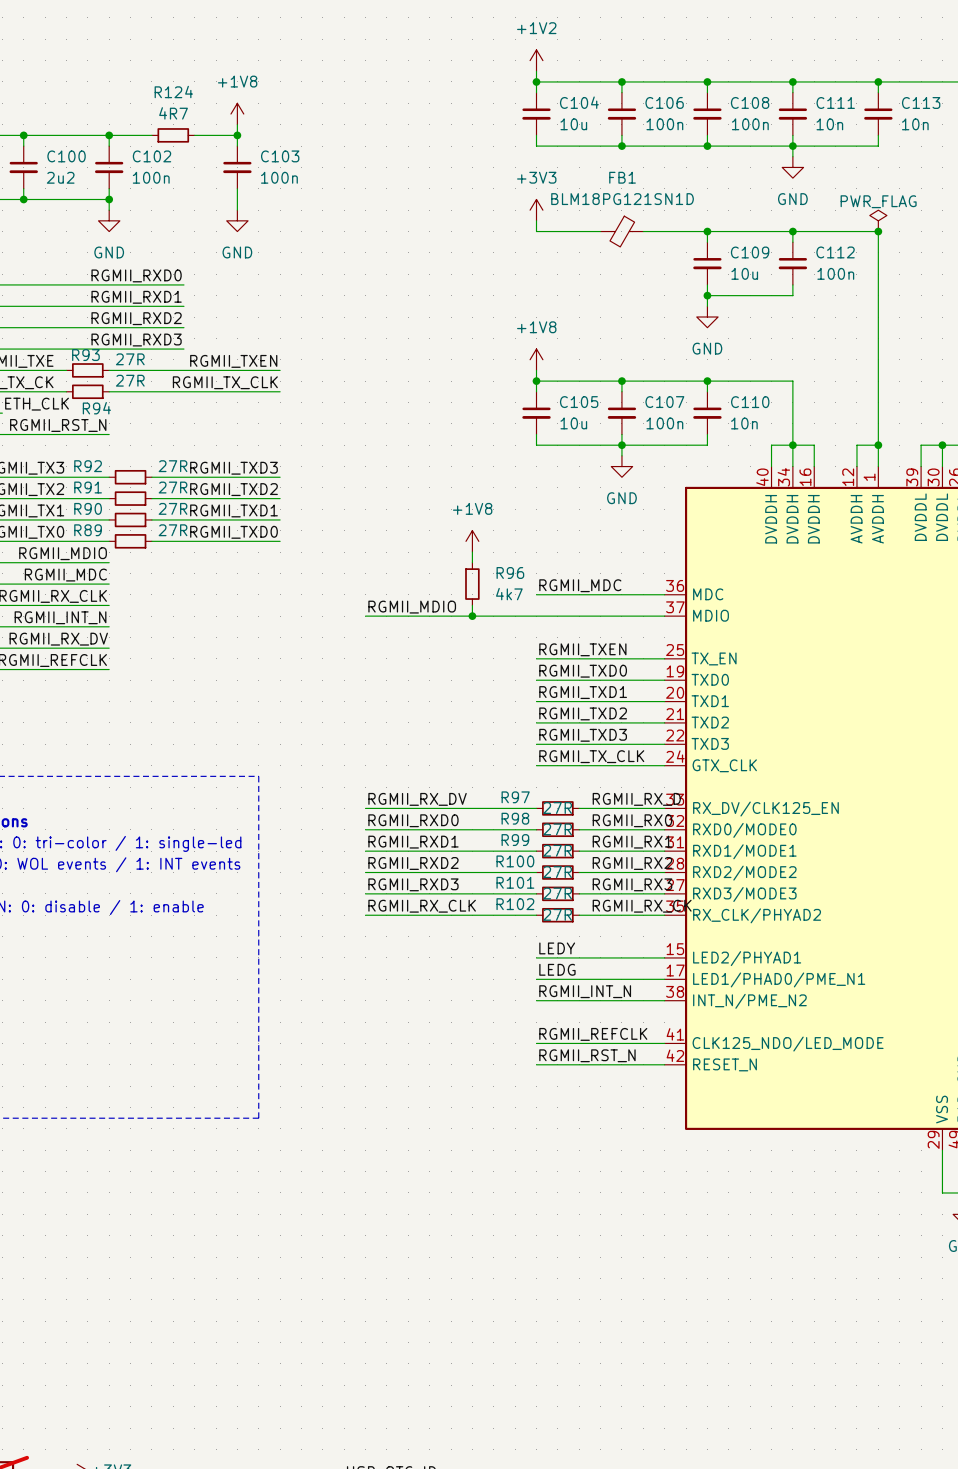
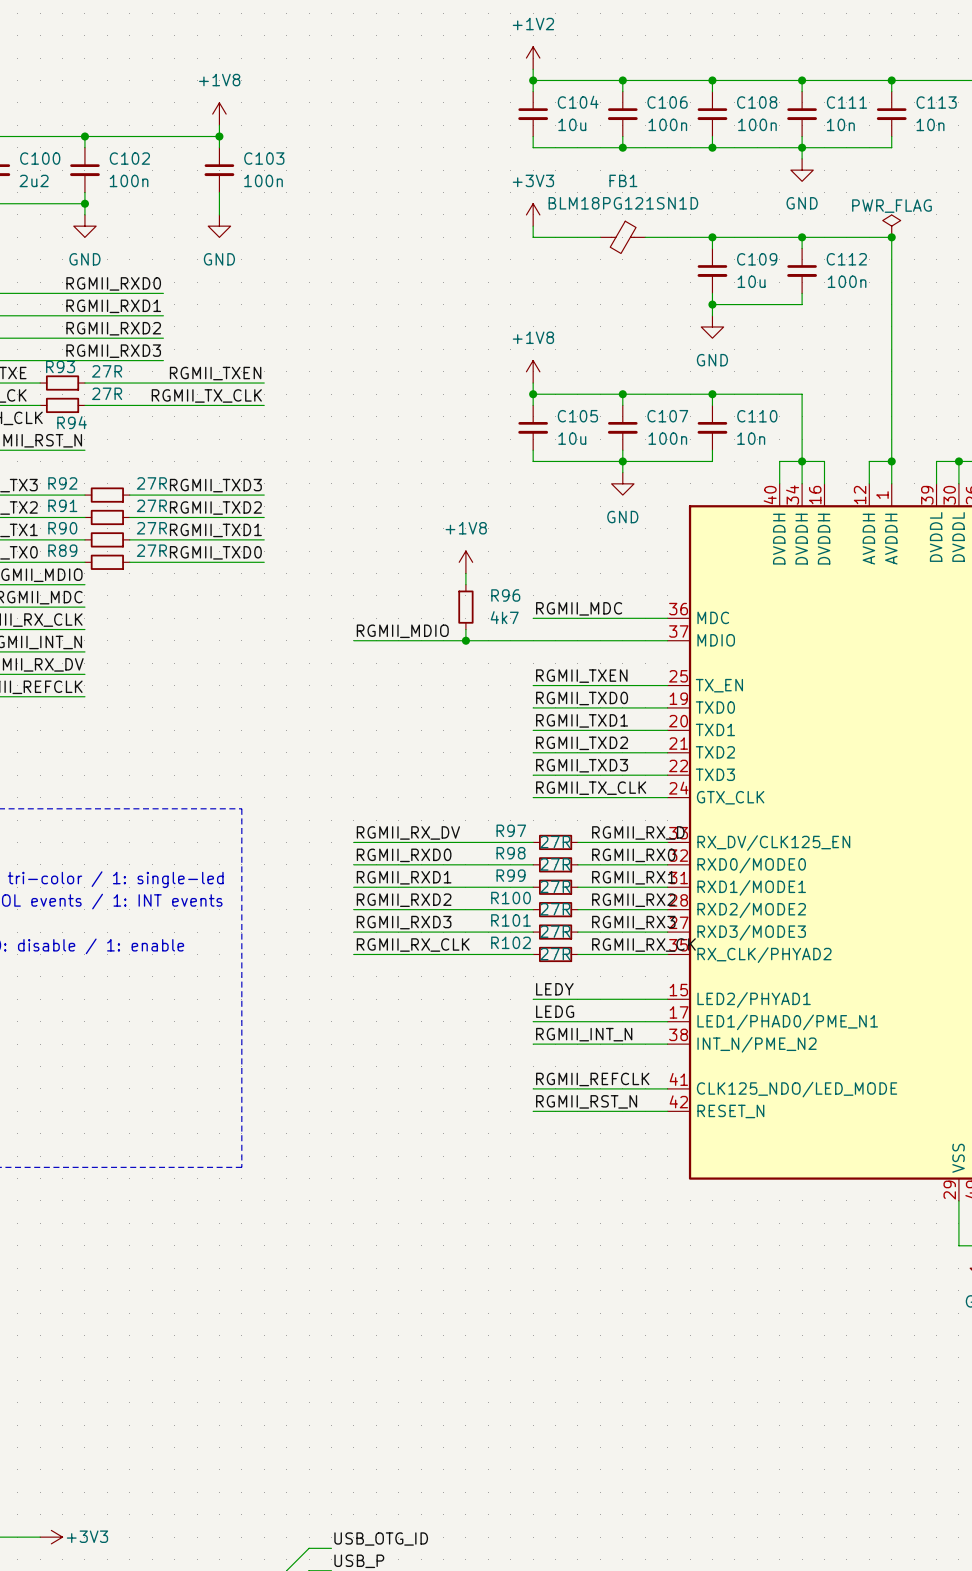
wire: none -> (129, 136) (174, 136)
R124: 4R7 (173, 135) -> none

